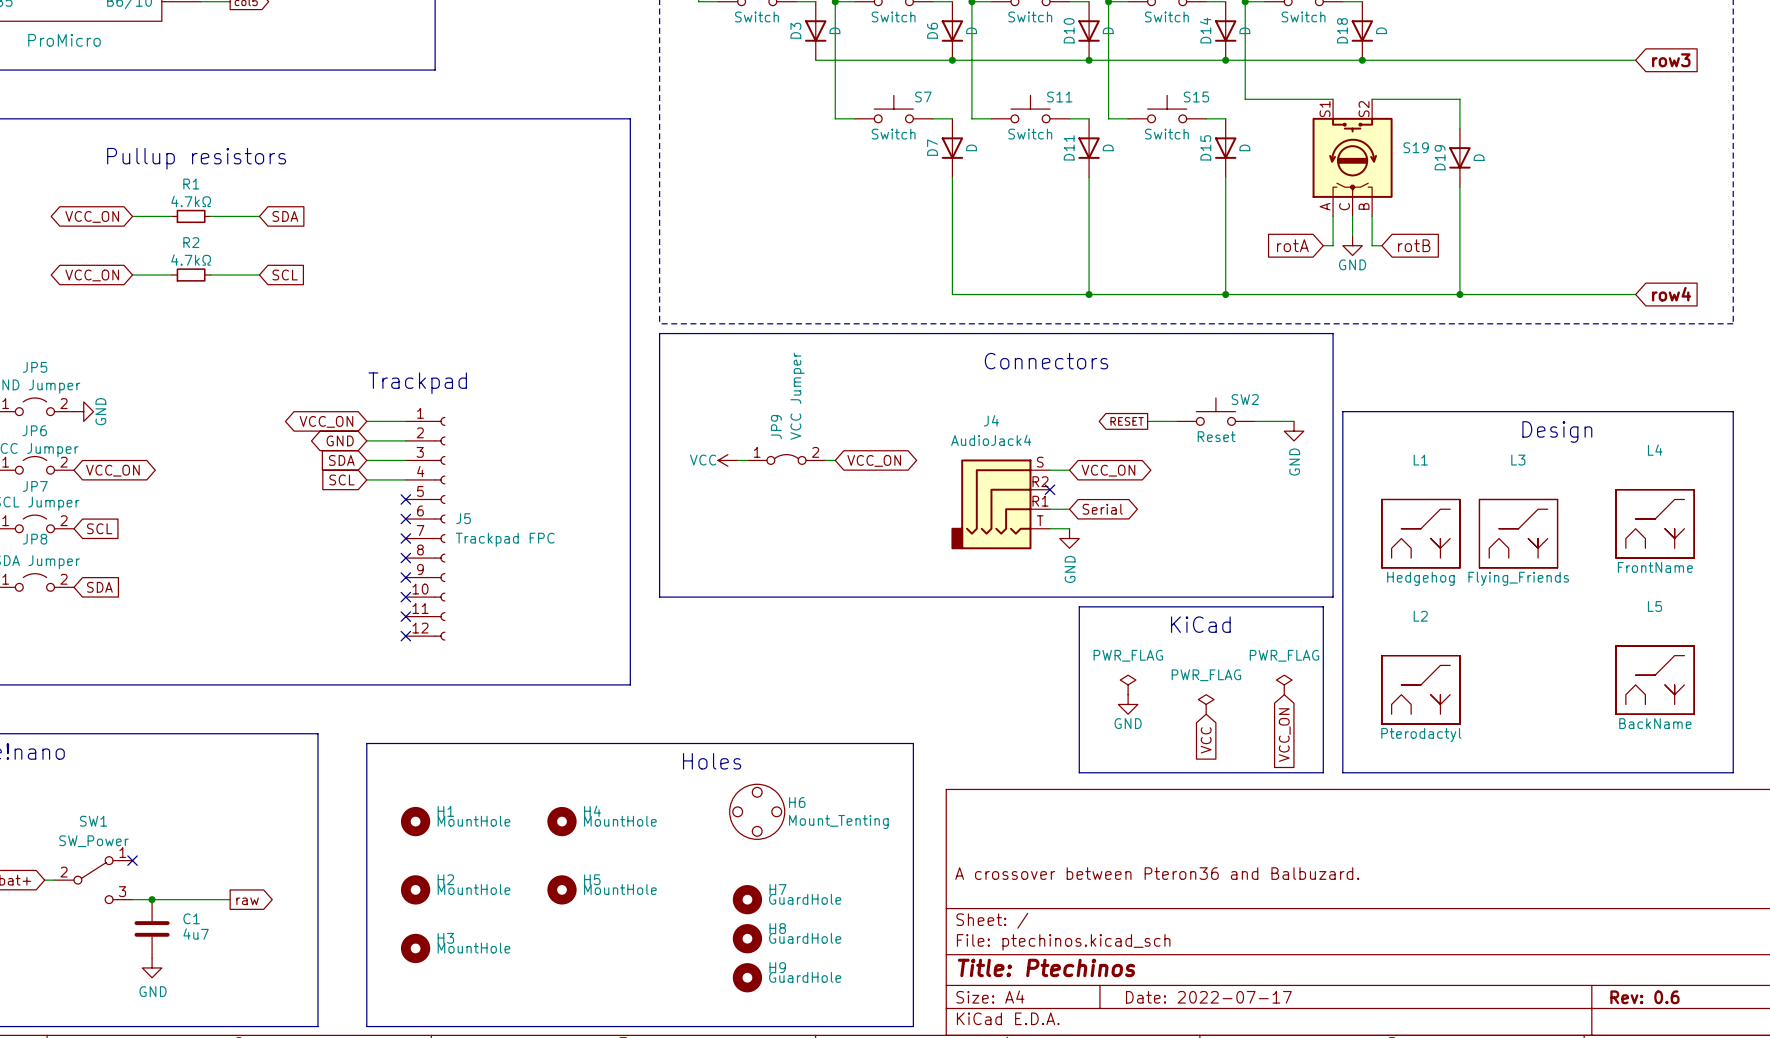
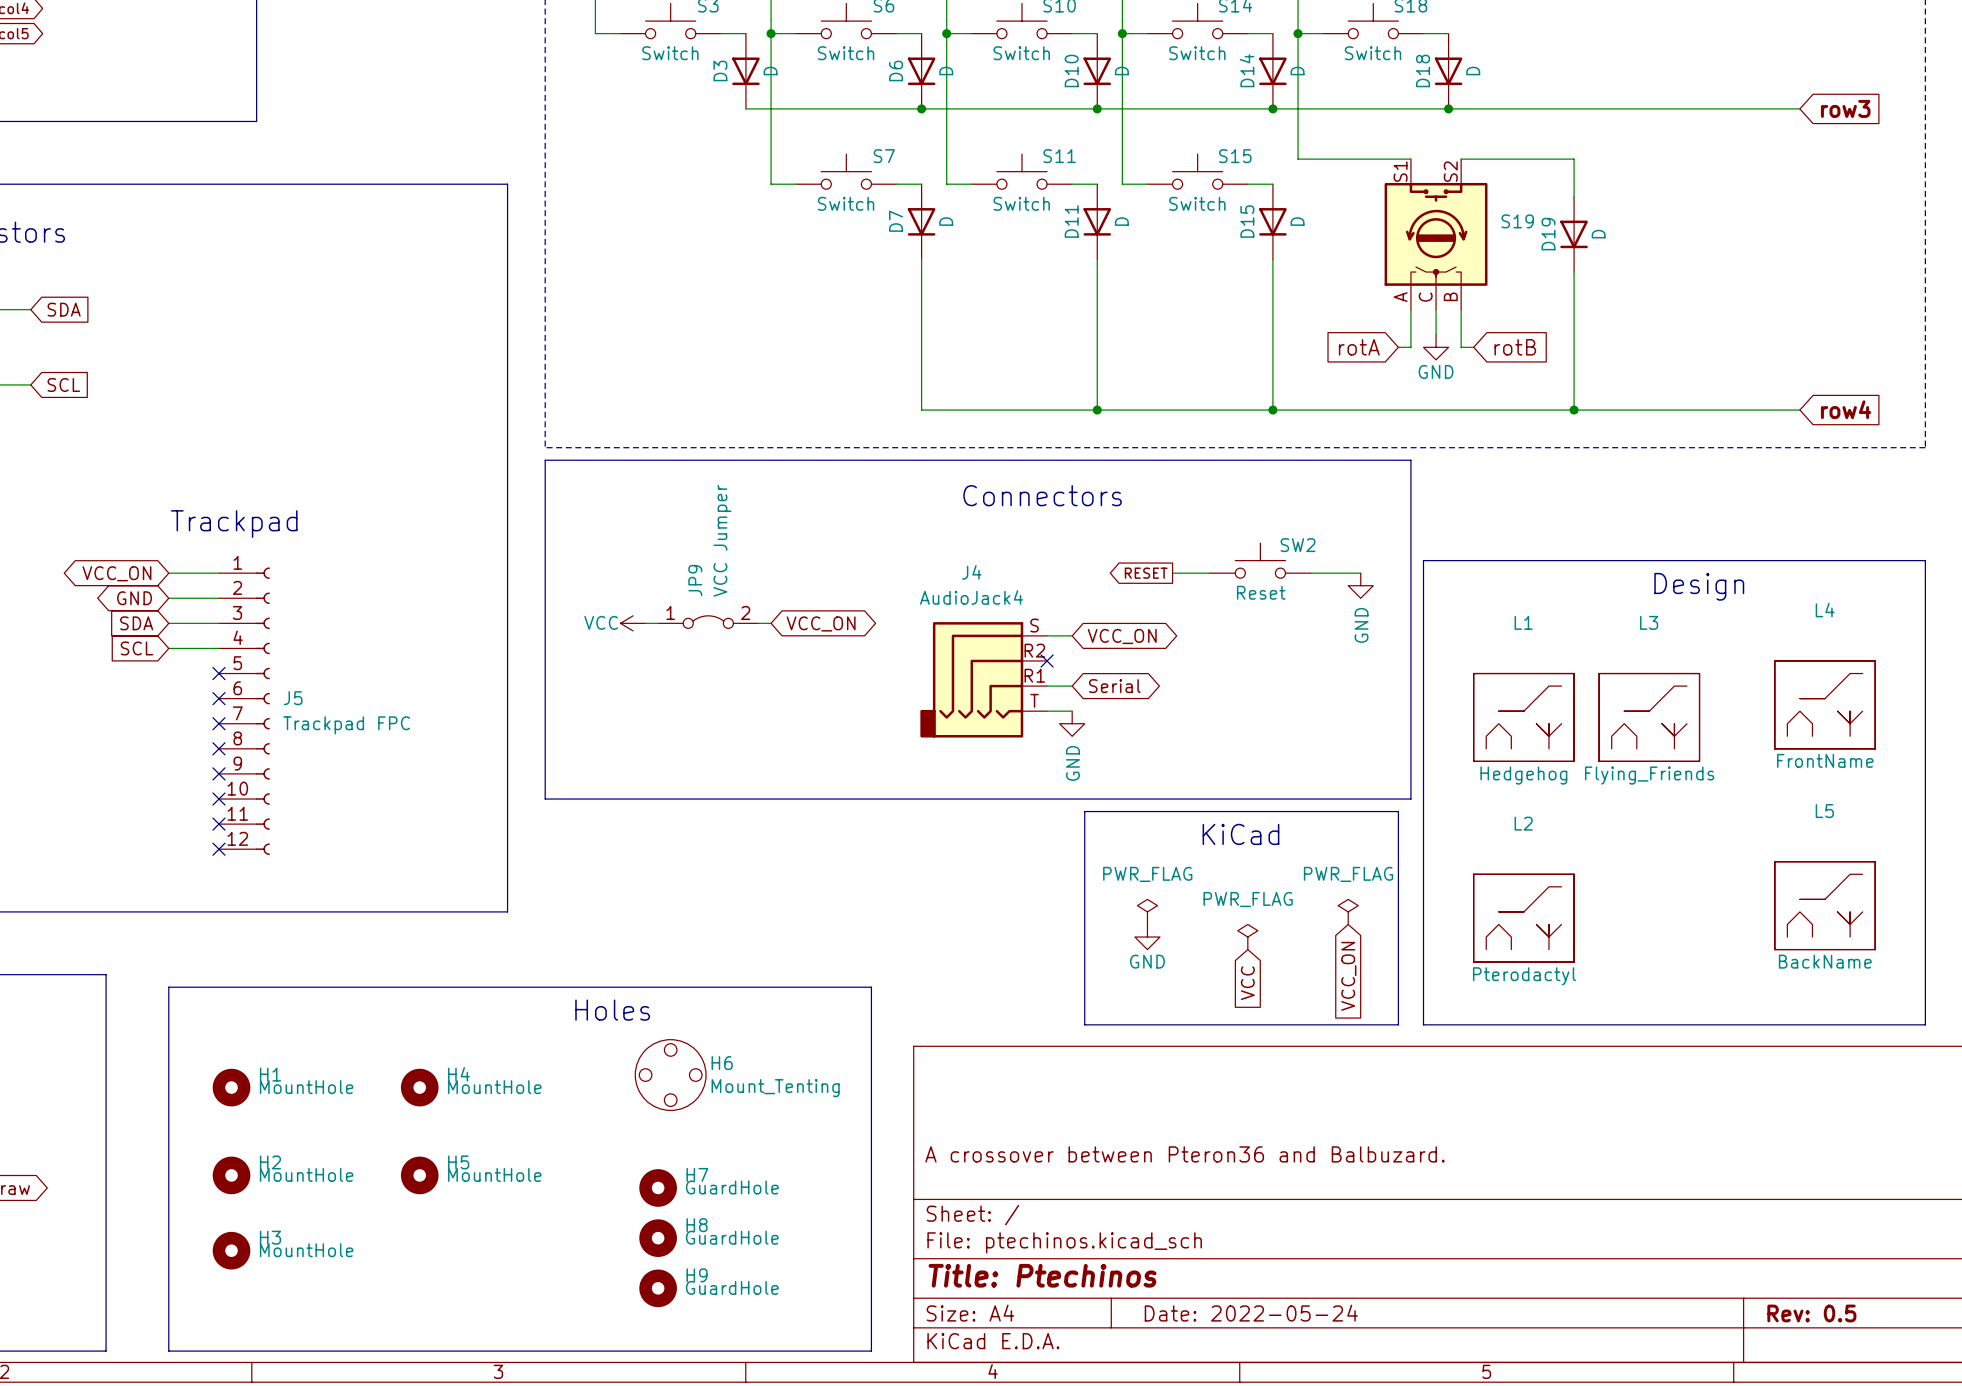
title block: Date: 2022-07-17 (1208, 997) -> Date: 2022-05-24 (1251, 1313)
title block: Rev: 0.6 (1644, 997) -> Rev: 0.5 (1811, 1313)

